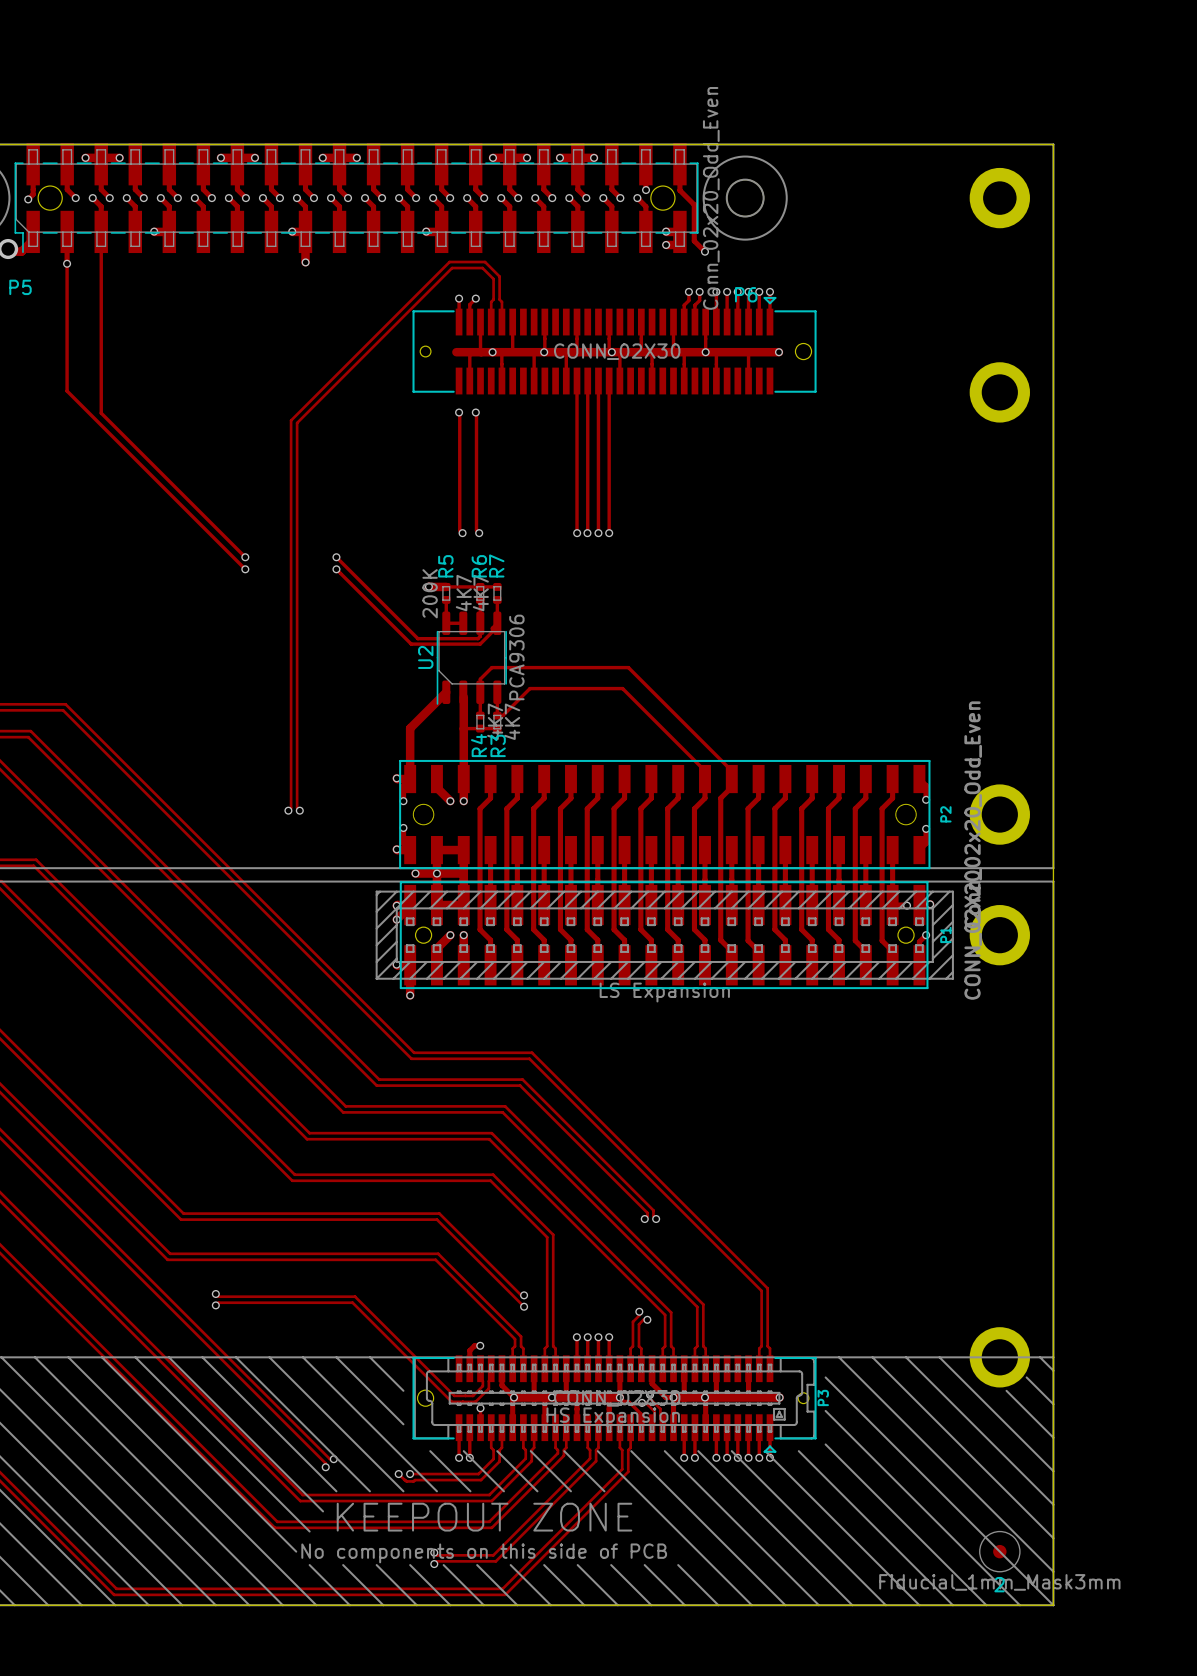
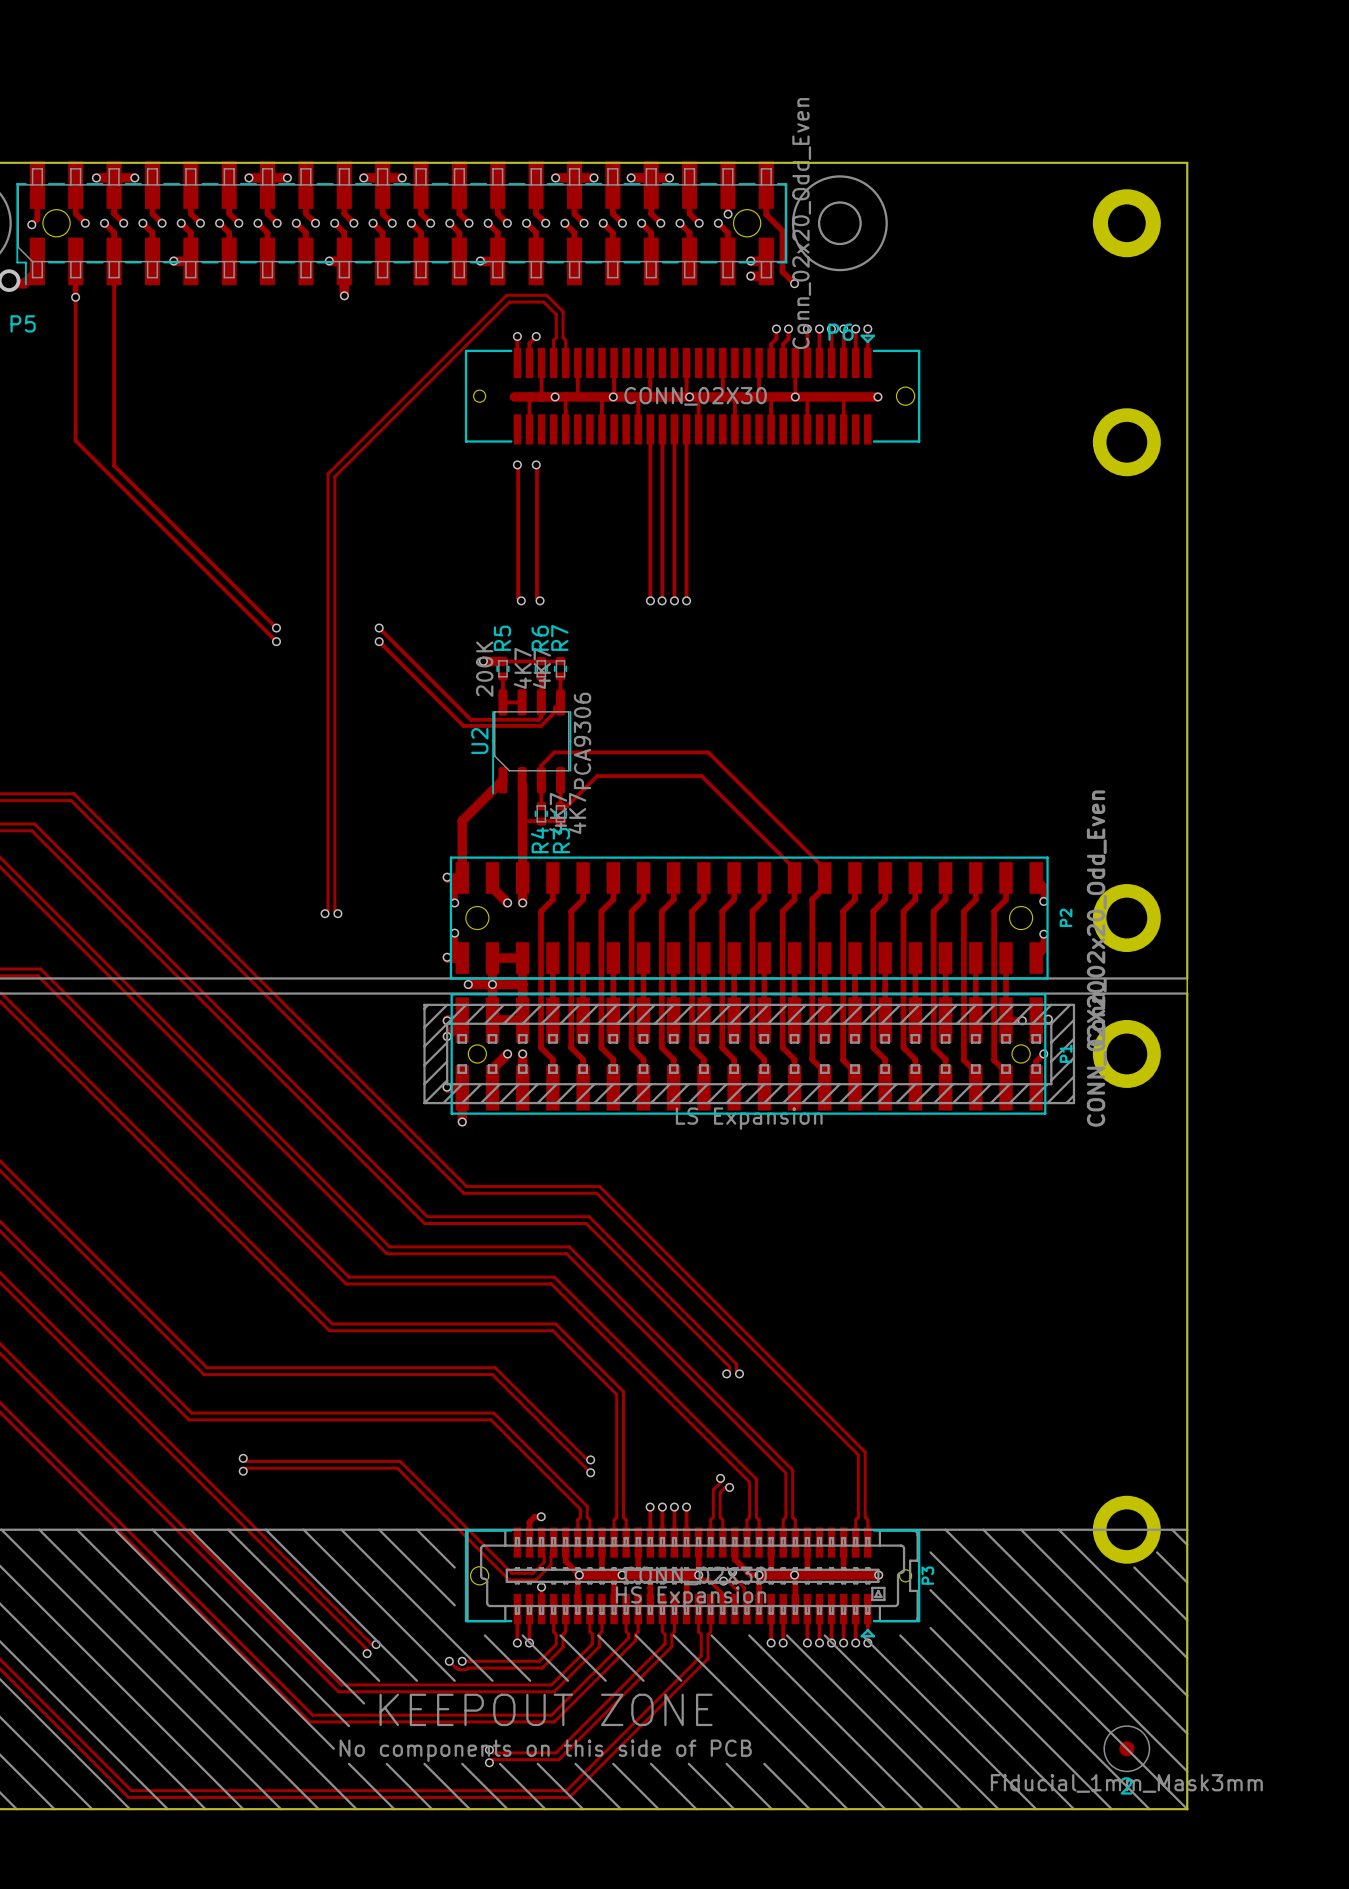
R5 footprint: [441, 582, 451, 604] -> [496, 657, 510, 681]
R6 footprint: [476, 582, 485, 604] -> [534, 657, 548, 681]
R7 footprint: [493, 582, 502, 604] -> [553, 657, 568, 681]
R4 footprint: [476, 711, 485, 733] -> [534, 802, 548, 826]
R3 footprint: [493, 711, 502, 733] -> [553, 802, 568, 826]

